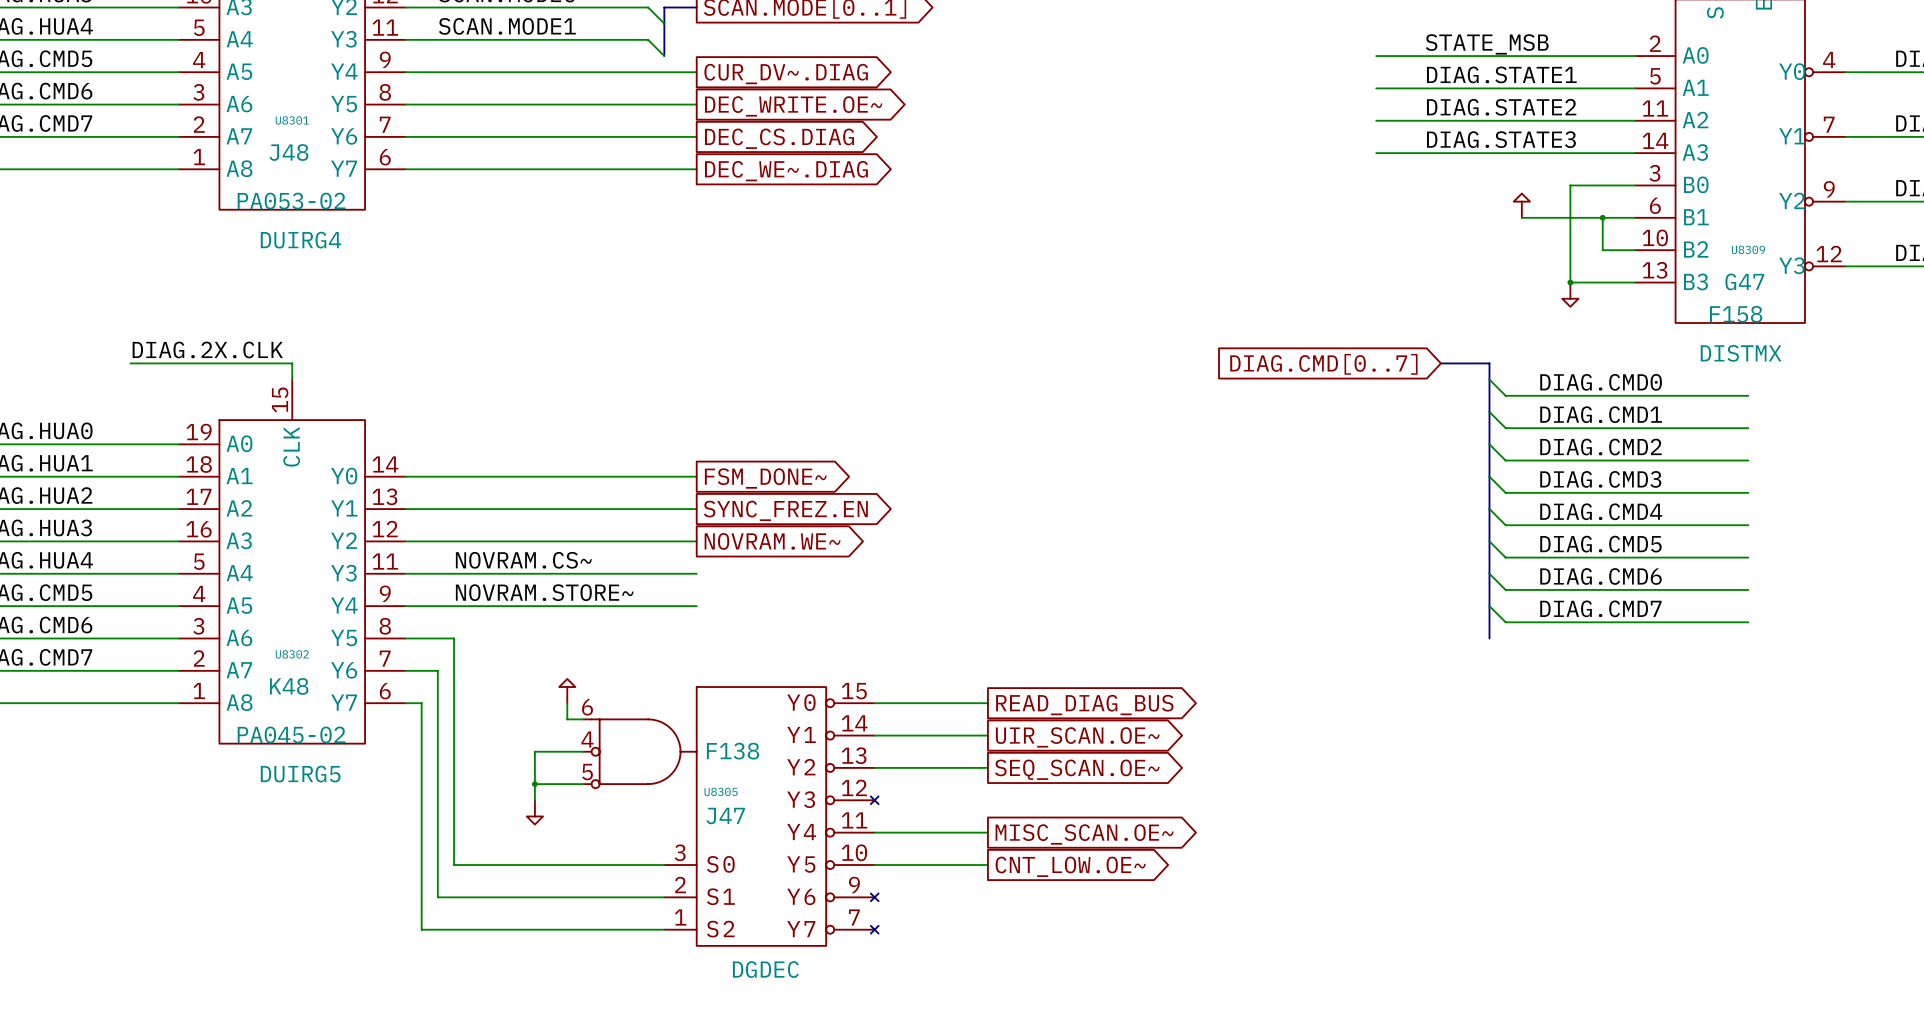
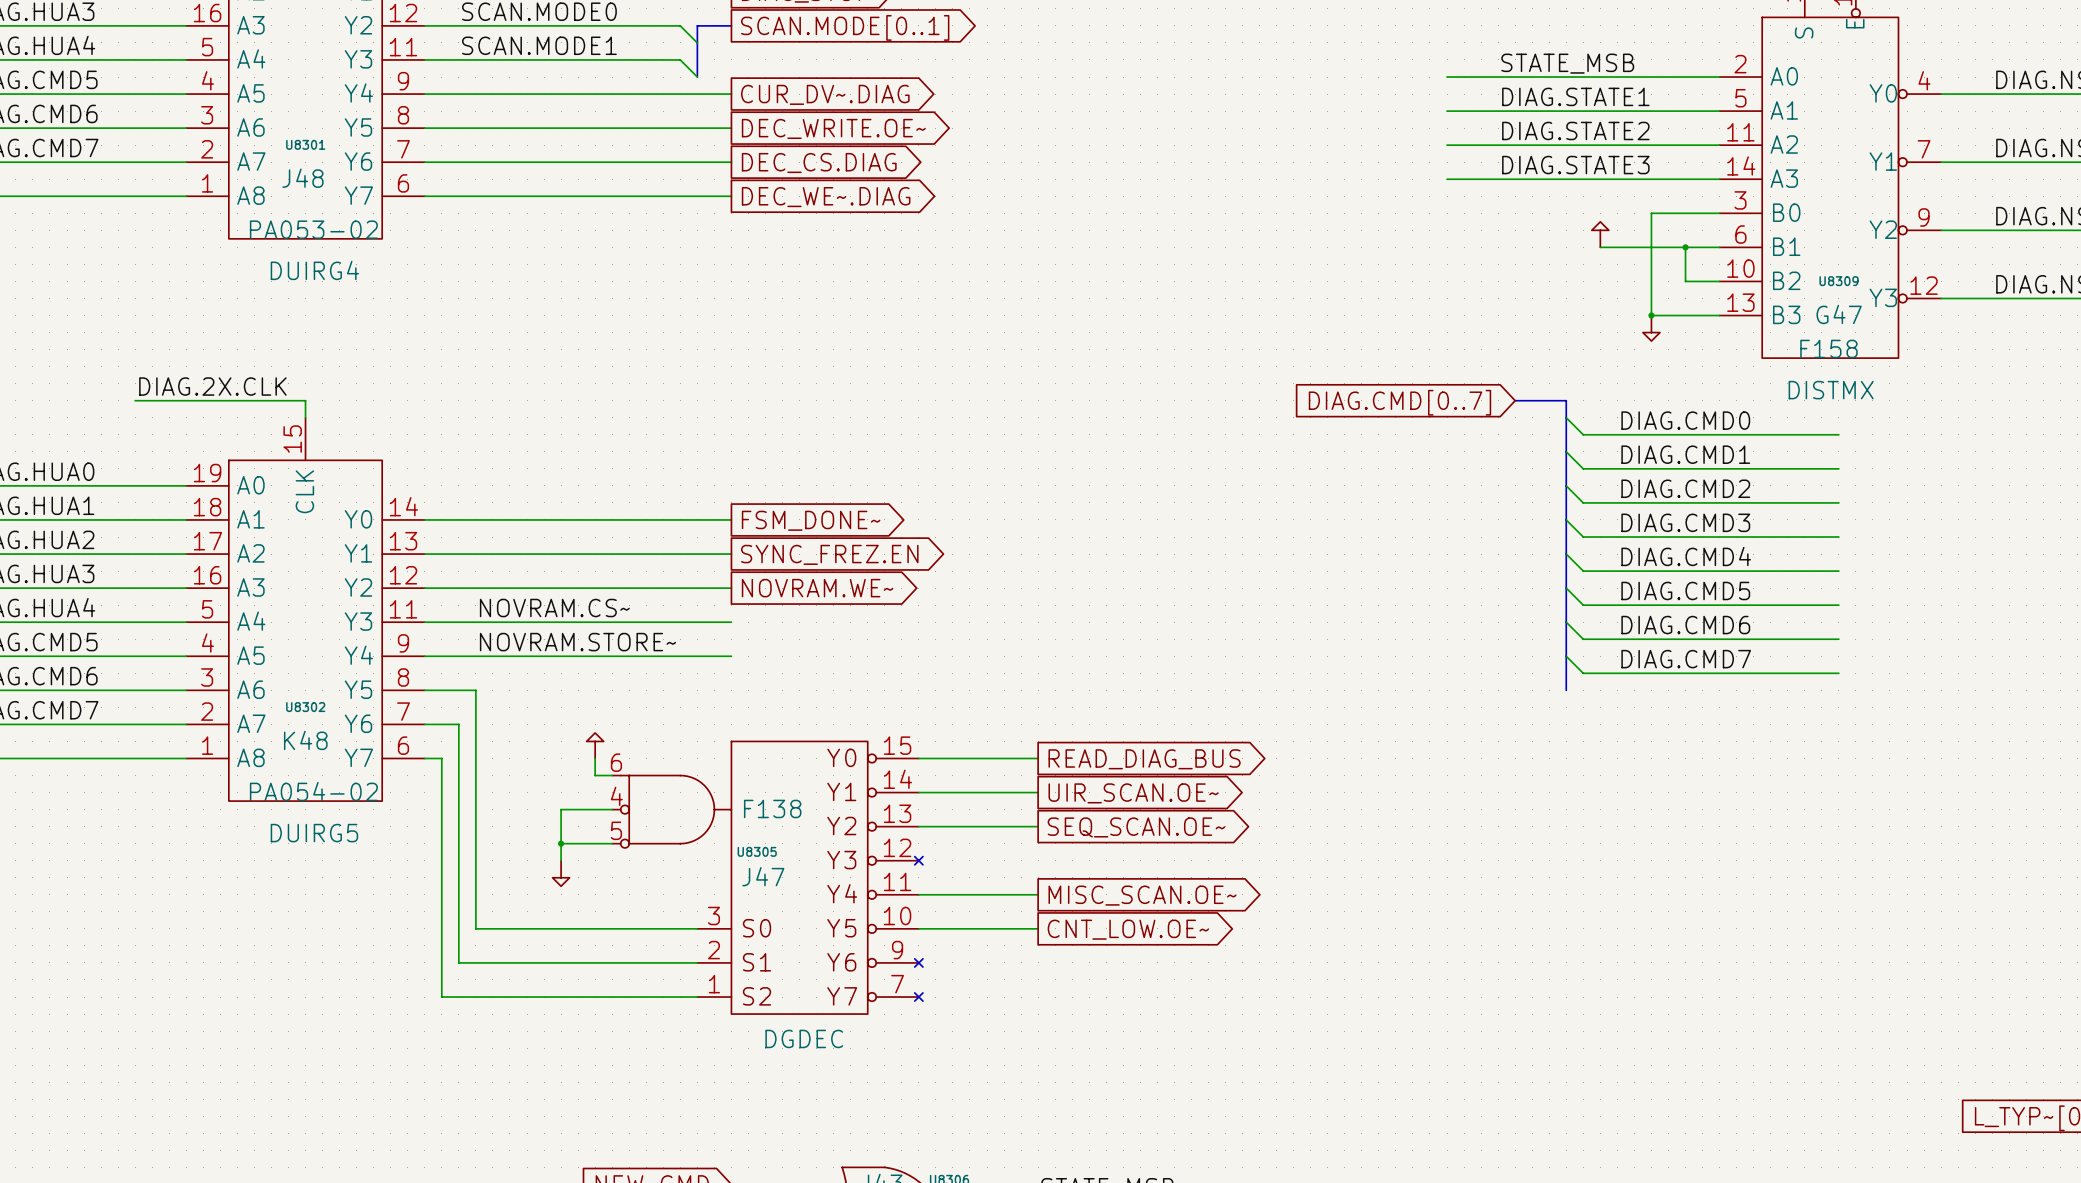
U8302 value: PA045-02 (291, 734) -> PA054-02 (313, 791)

